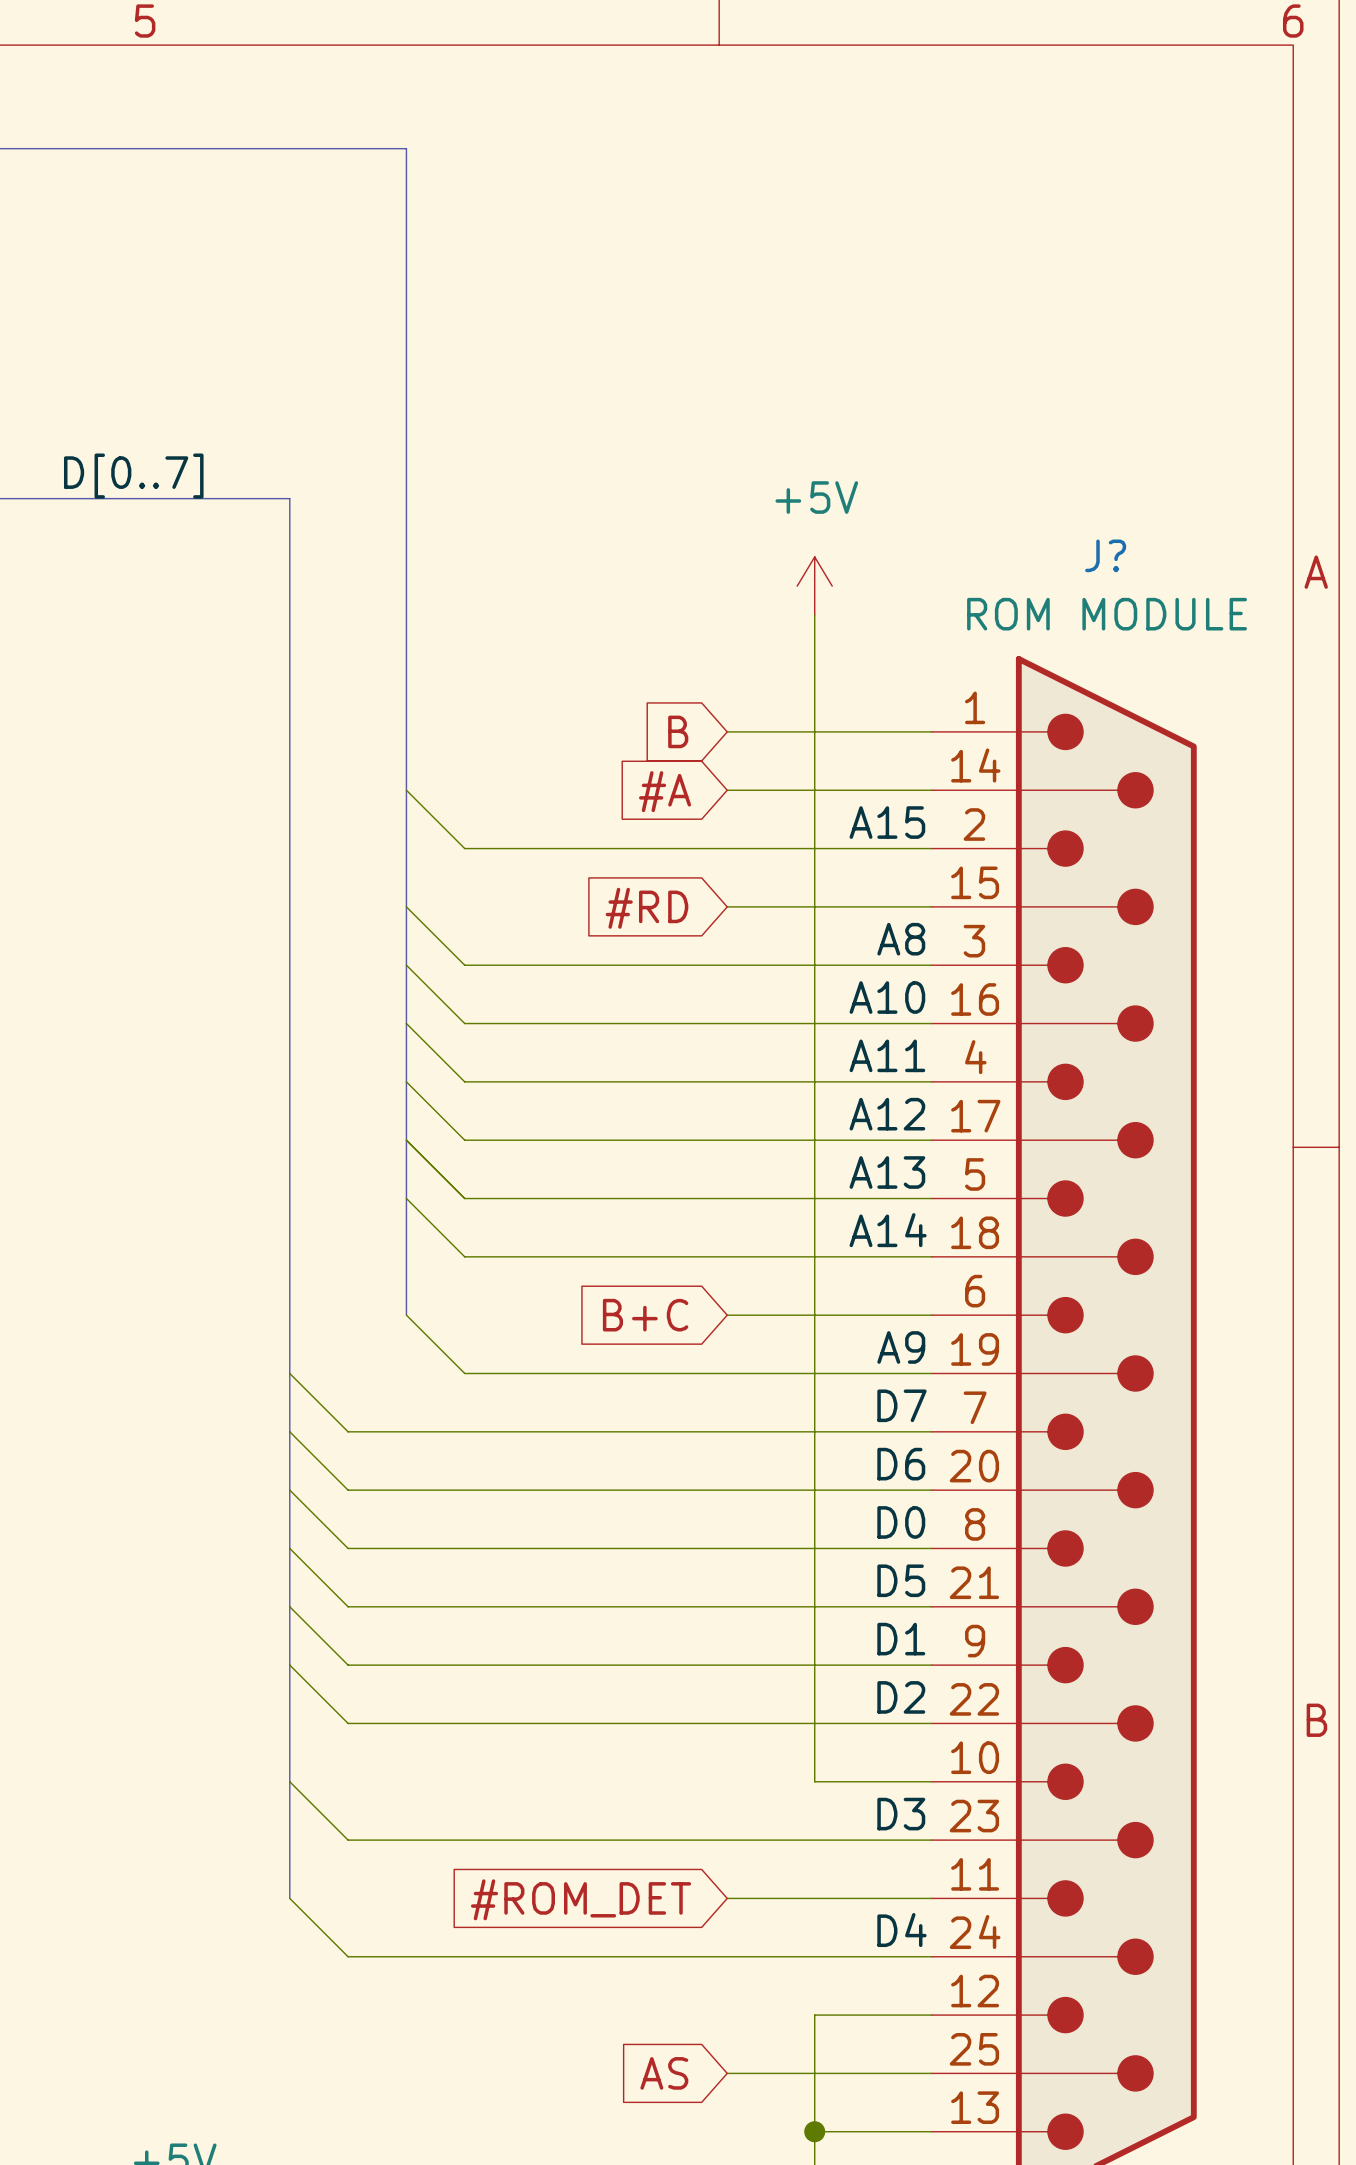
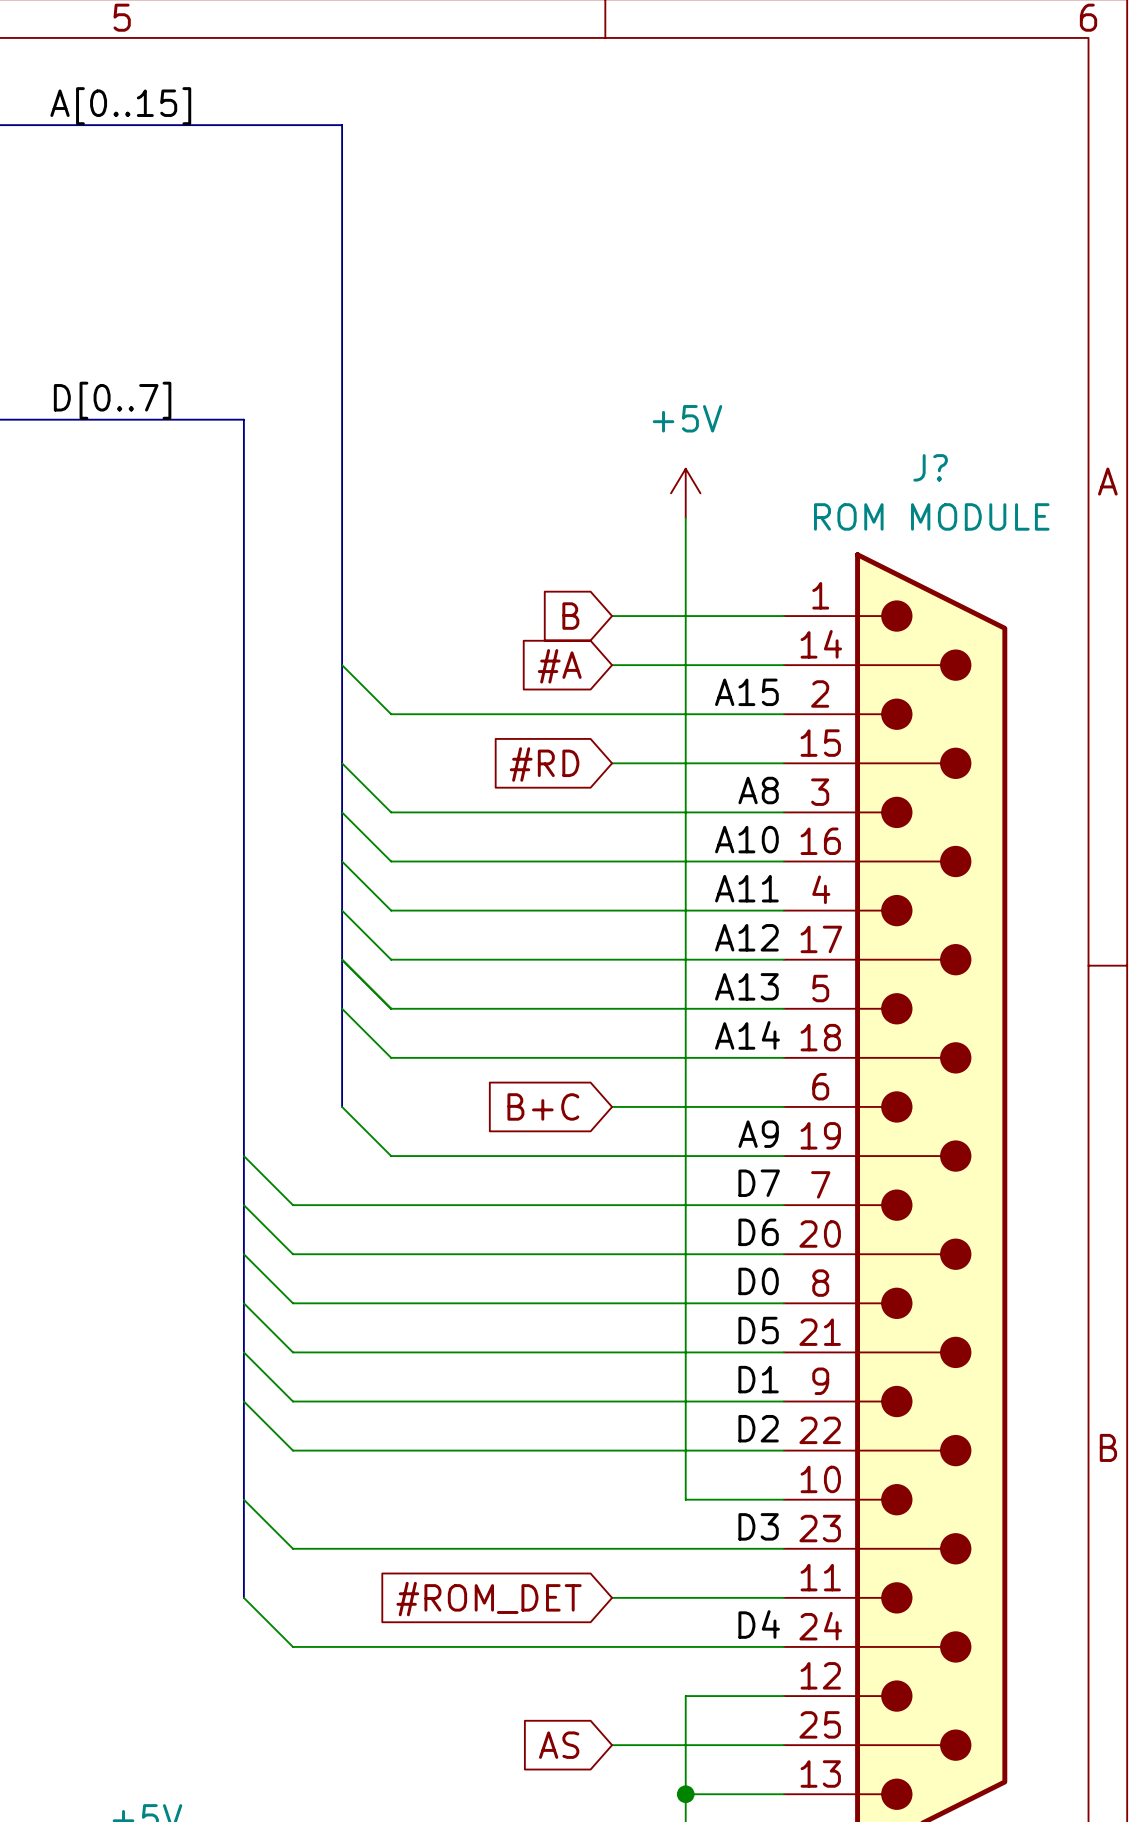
label: none -> A[0..15] (120, 106)

